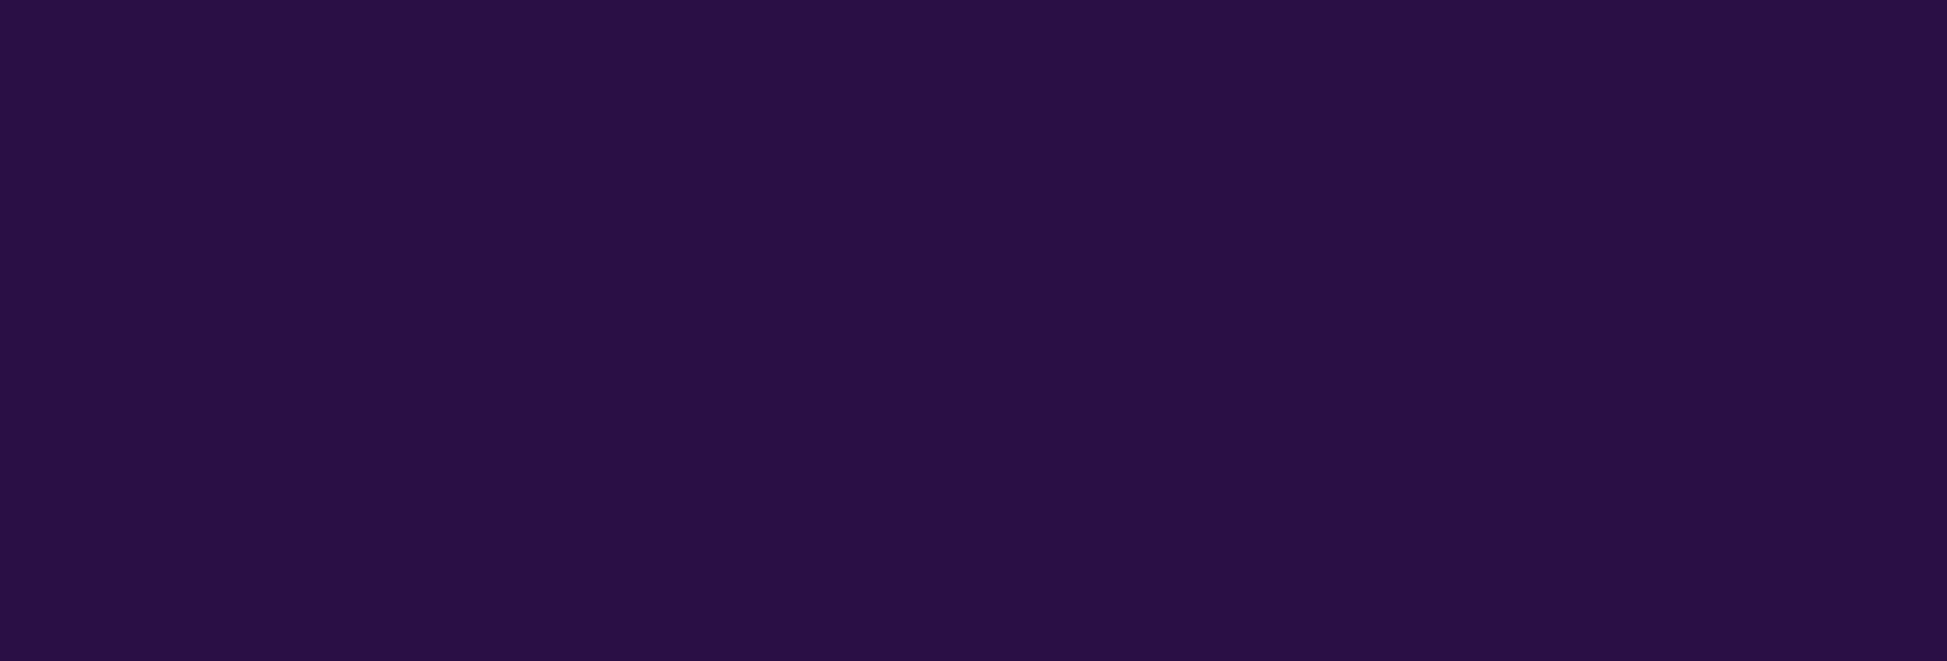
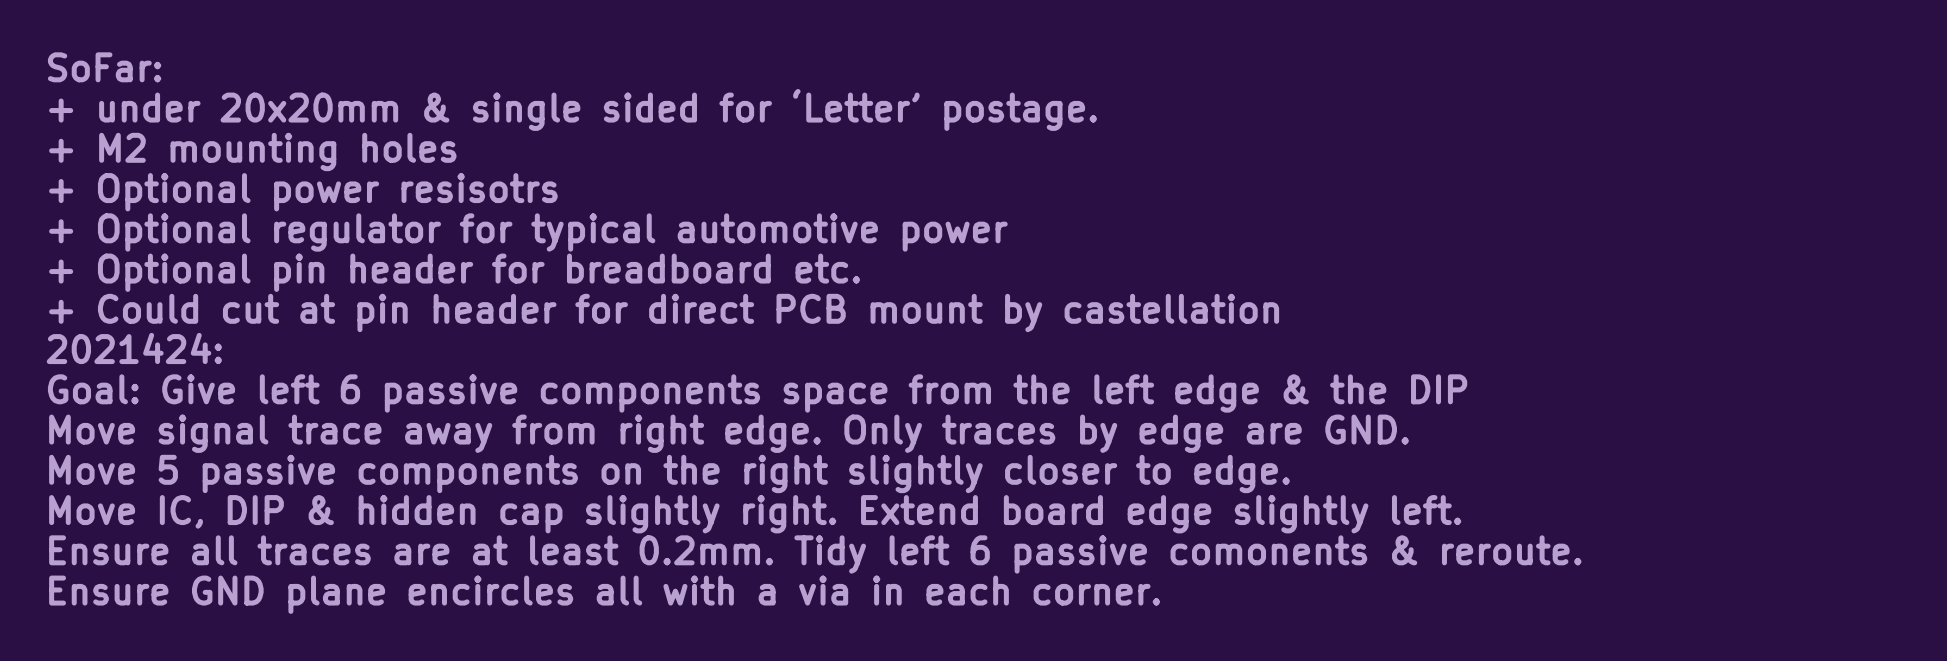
text: none -> SoFar: (104, 67)
text: none -> + under 20x20mm & single sided for ‘Letter’ postage. (573, 109)
text: none -> + M2 mounting holes (252, 151)
text: none -> + Optional power resisotrs (303, 192)
text: none -> + Optional regulator for typical automotive power (528, 232)
text: none -> + Optional pin header for breadboard etc. (454, 272)
text: none -> + Could cut at pin header for direct PCB mount by castellation (664, 312)
text: none -> 2021424: (134, 348)
text: none -> Goal: Give left 6 passive components space from the left edge & the DIP (757, 393)
text: none -> Move signal trace away from right edge. Only traces by edge are GND. (729, 433)
text: none -> Move 5 passive components on the right slightly closer to edge. (669, 473)
text: none -> Move IC, DIP & hidden cap slightly right. Extend board edge slightly left. (755, 514)
text: none -> Ensure all traces are at least 0.2mm. Tidy left 6 passive comonents & reroute. (815, 554)
text: none -> Ensure GND plane encircles all with a via in each corner. (604, 594)

